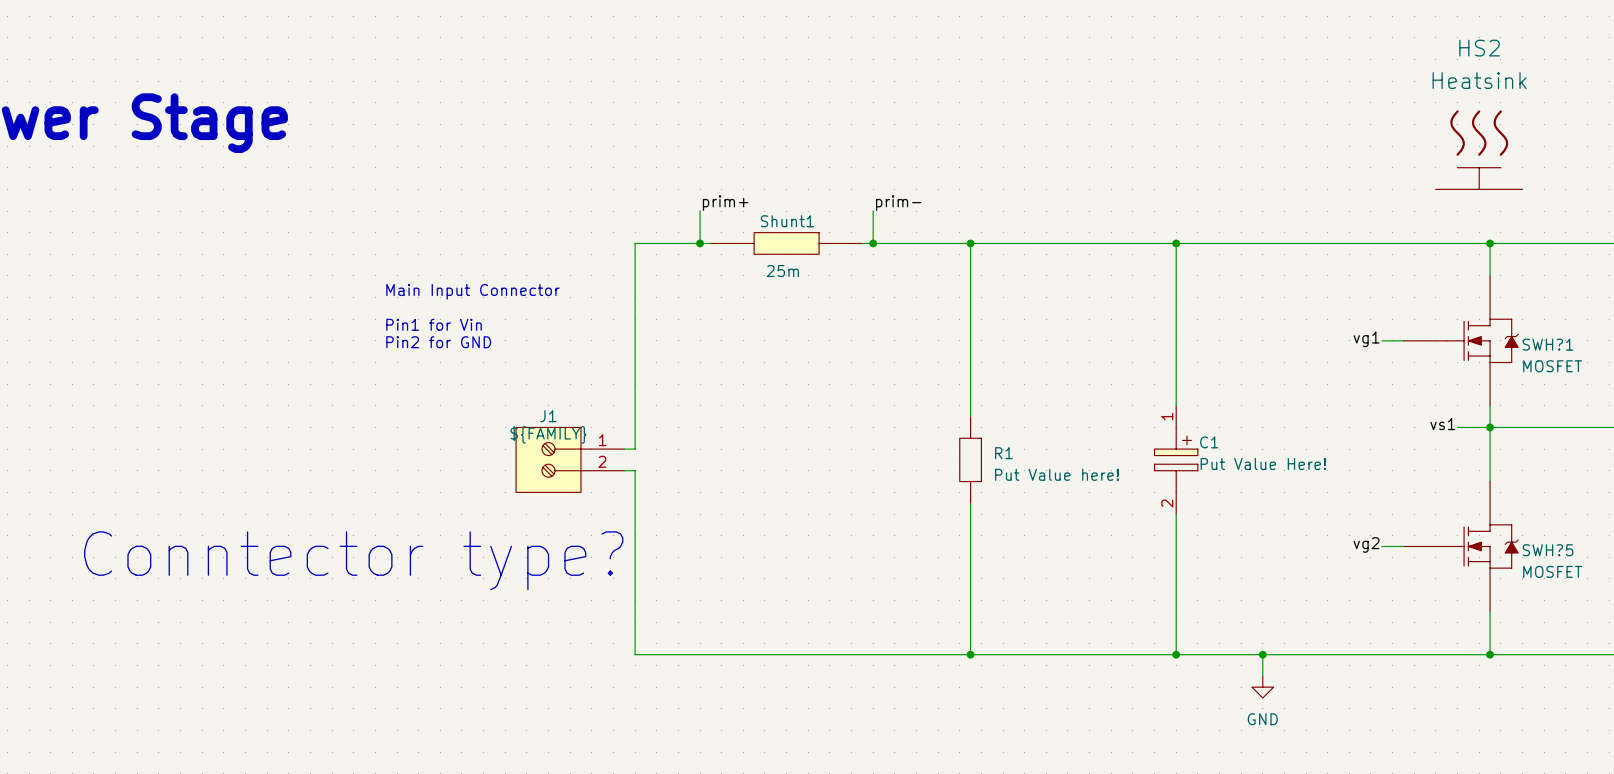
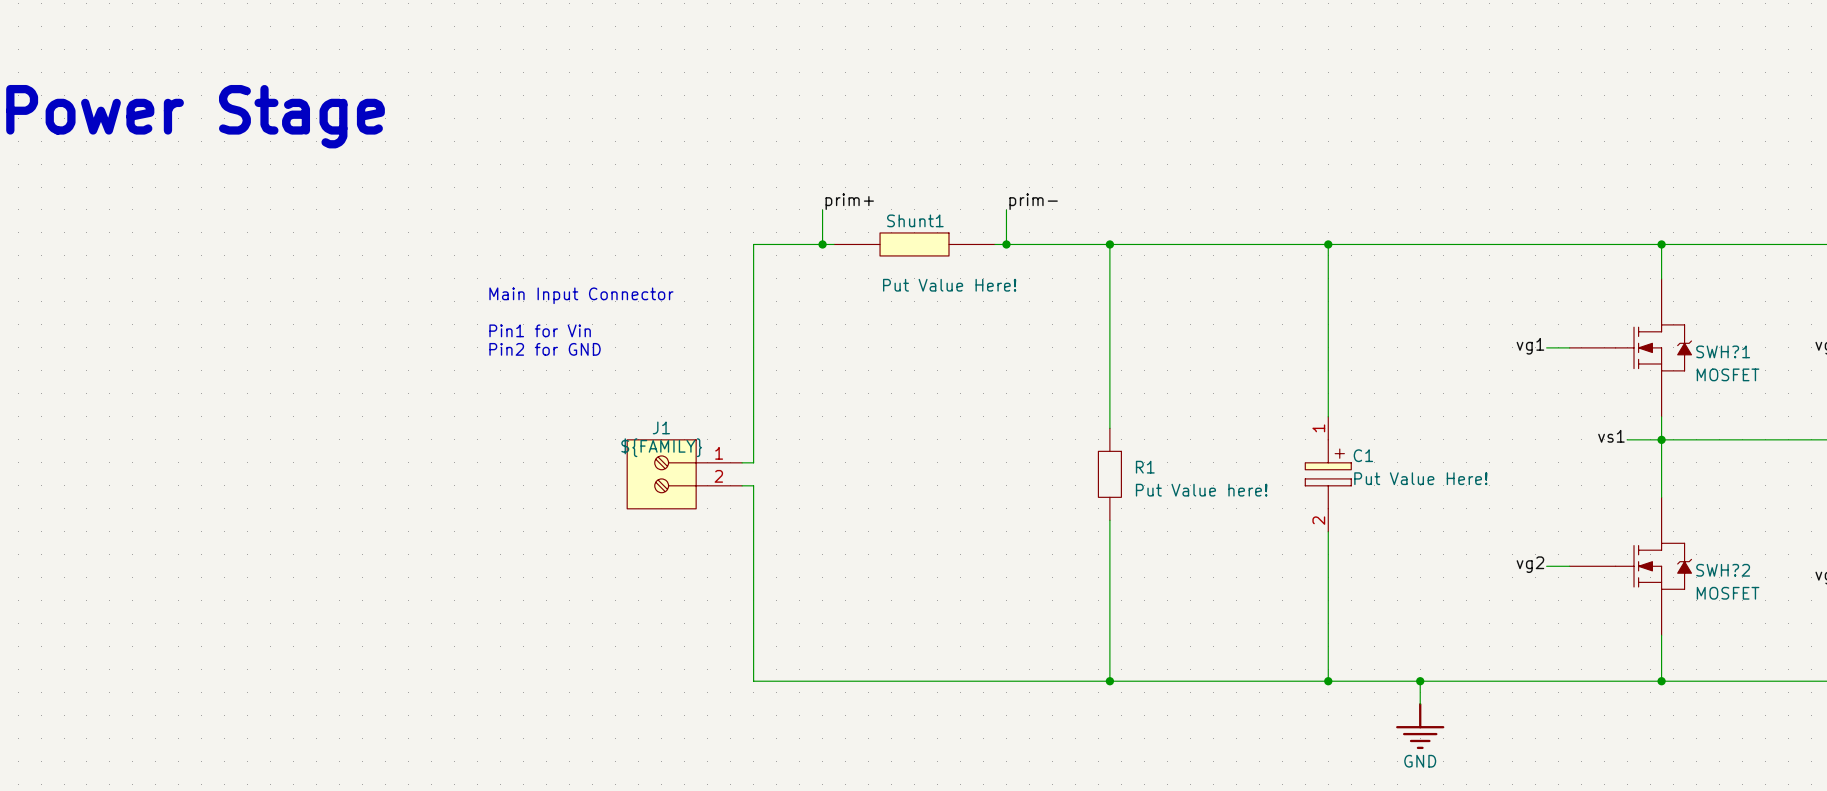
HS2: Heatsink (1479, 149) -> none
Shunt1 value: 25m (782, 271) -> Put Value Here! (949, 285)
SWH?5 name: SWH?5 (1547, 550) -> SWH?2 (1723, 570)
text: Conntector type? (353, 560) -> none
power symbol: GND (1262, 687) -> none
power symbol: none -> GND (1420, 726)

